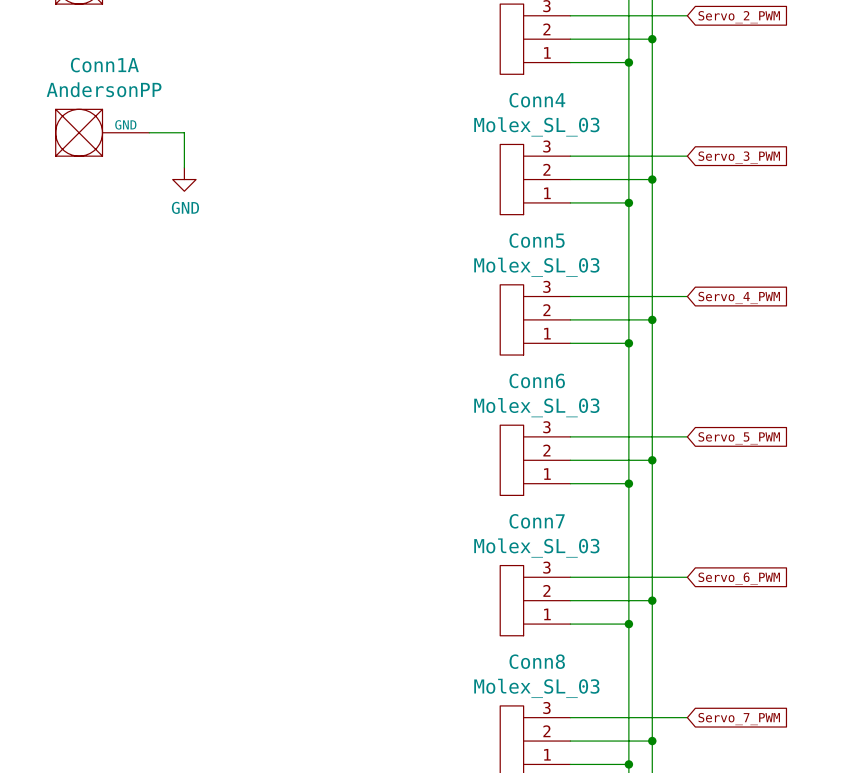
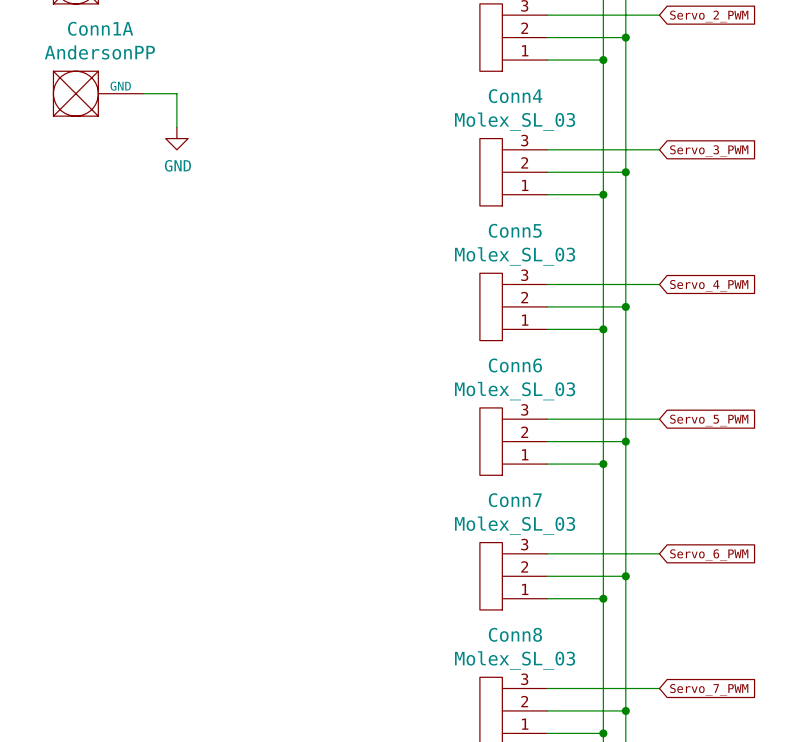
Conn1A position: (102, 132) -> (98, 93)
wire: (149, 132) (184, 132) (184, 167) -> (143, 93) (176, 93) (176, 127)
power symbol position: GND (184, 179) -> GND (176, 138)

